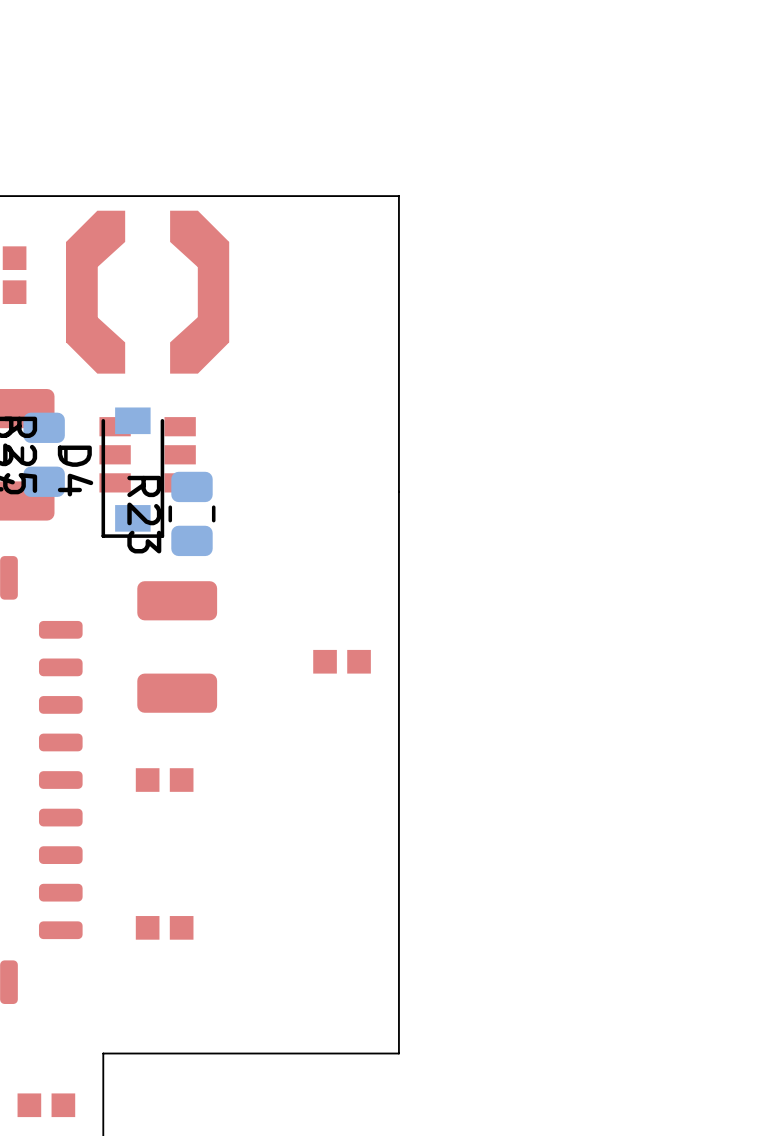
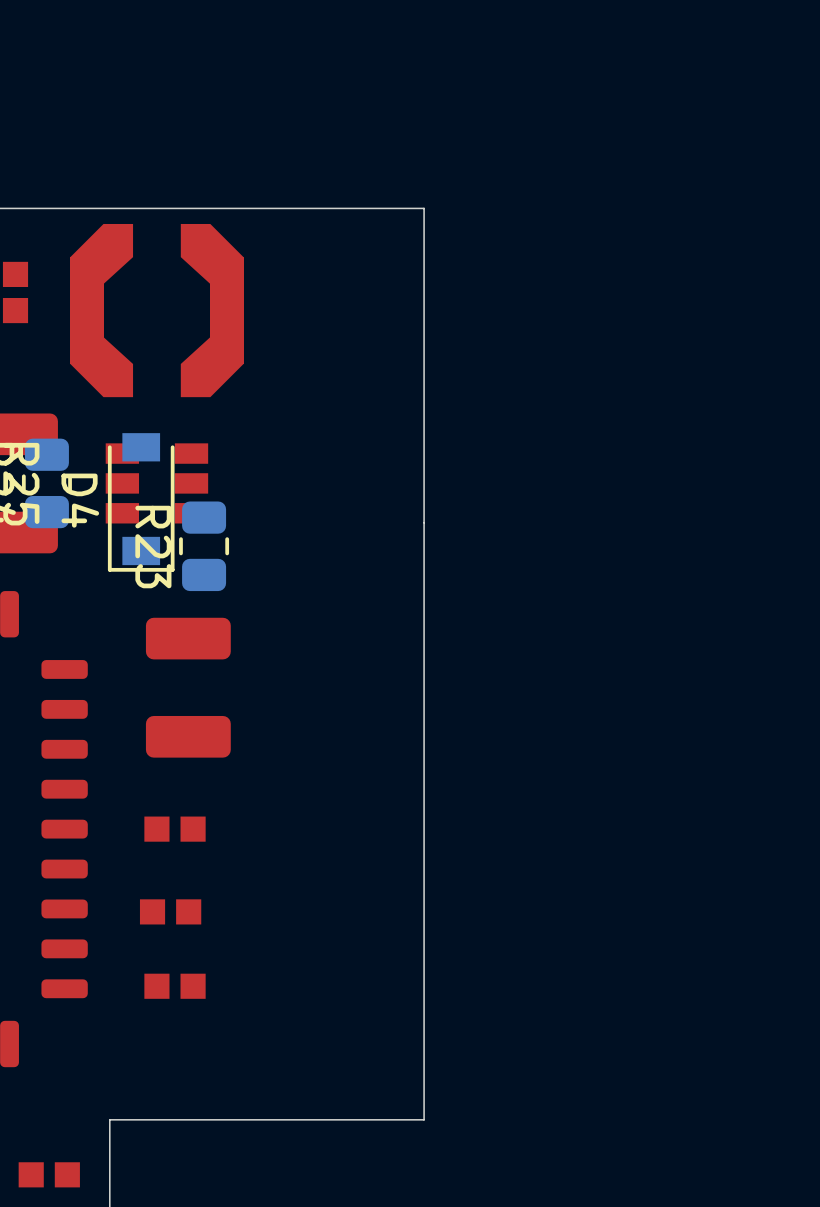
part position: (342, 661) -> (170, 911)

